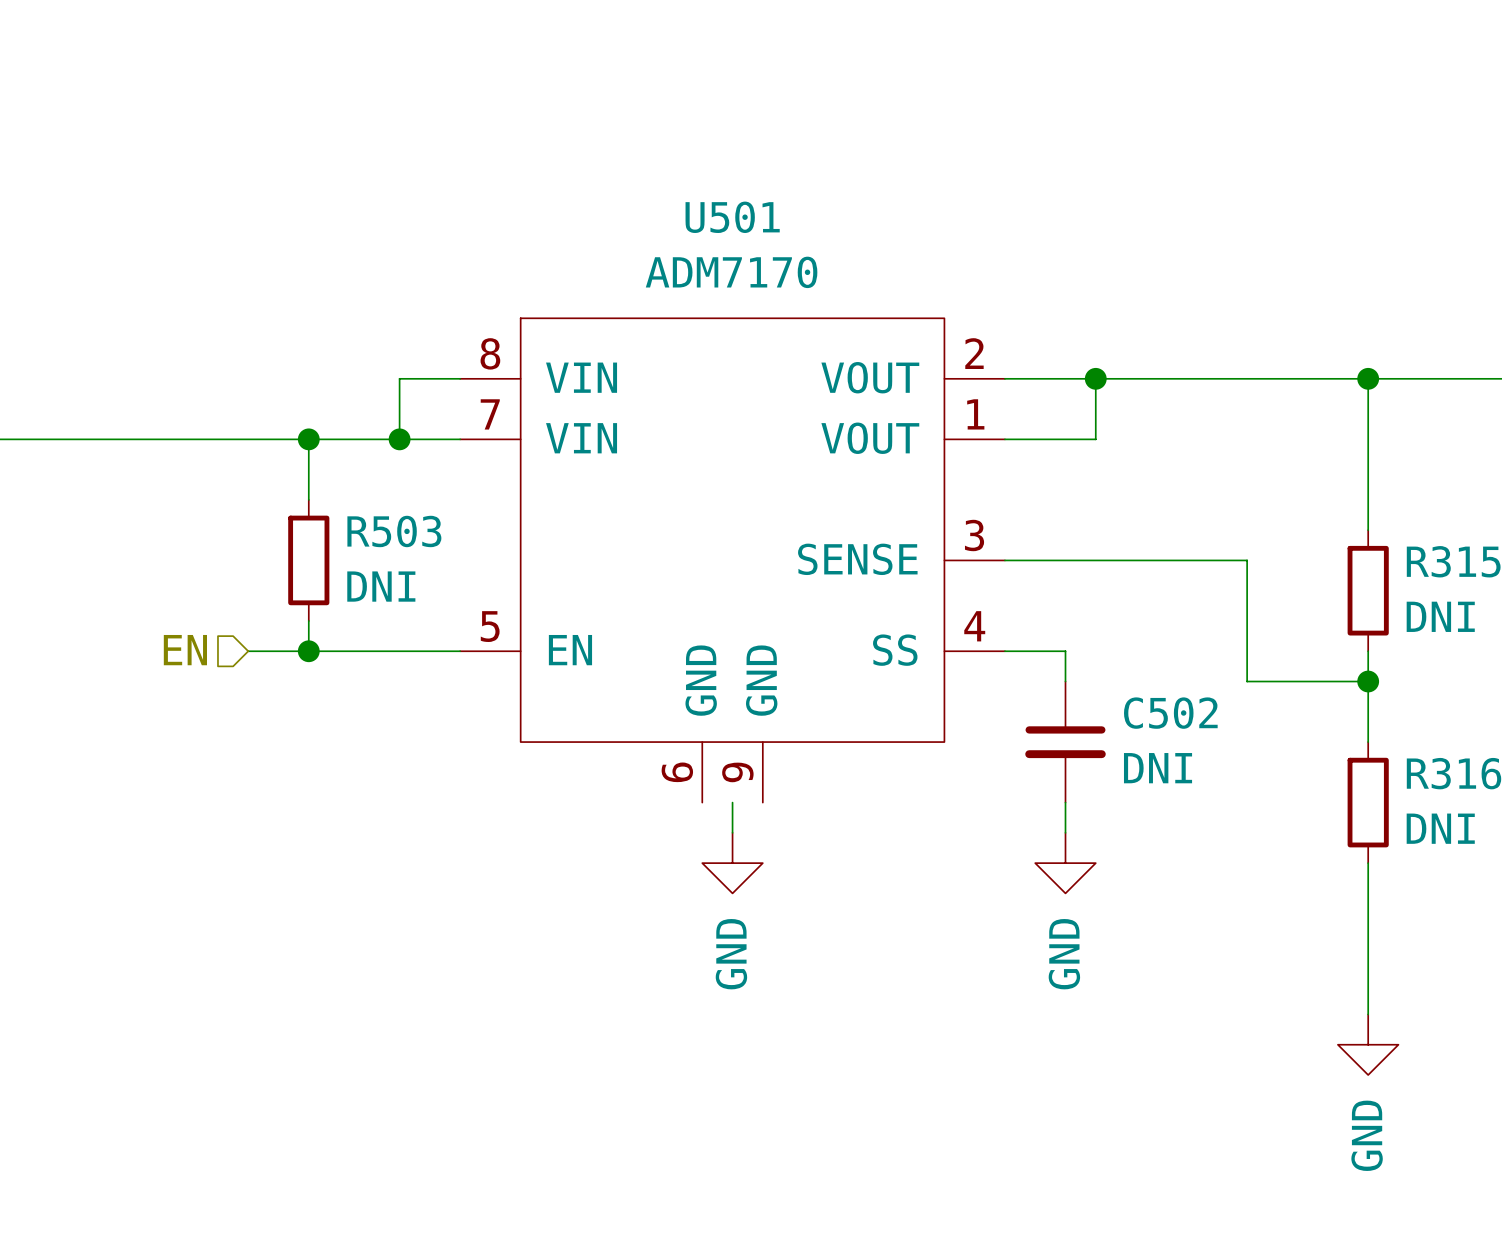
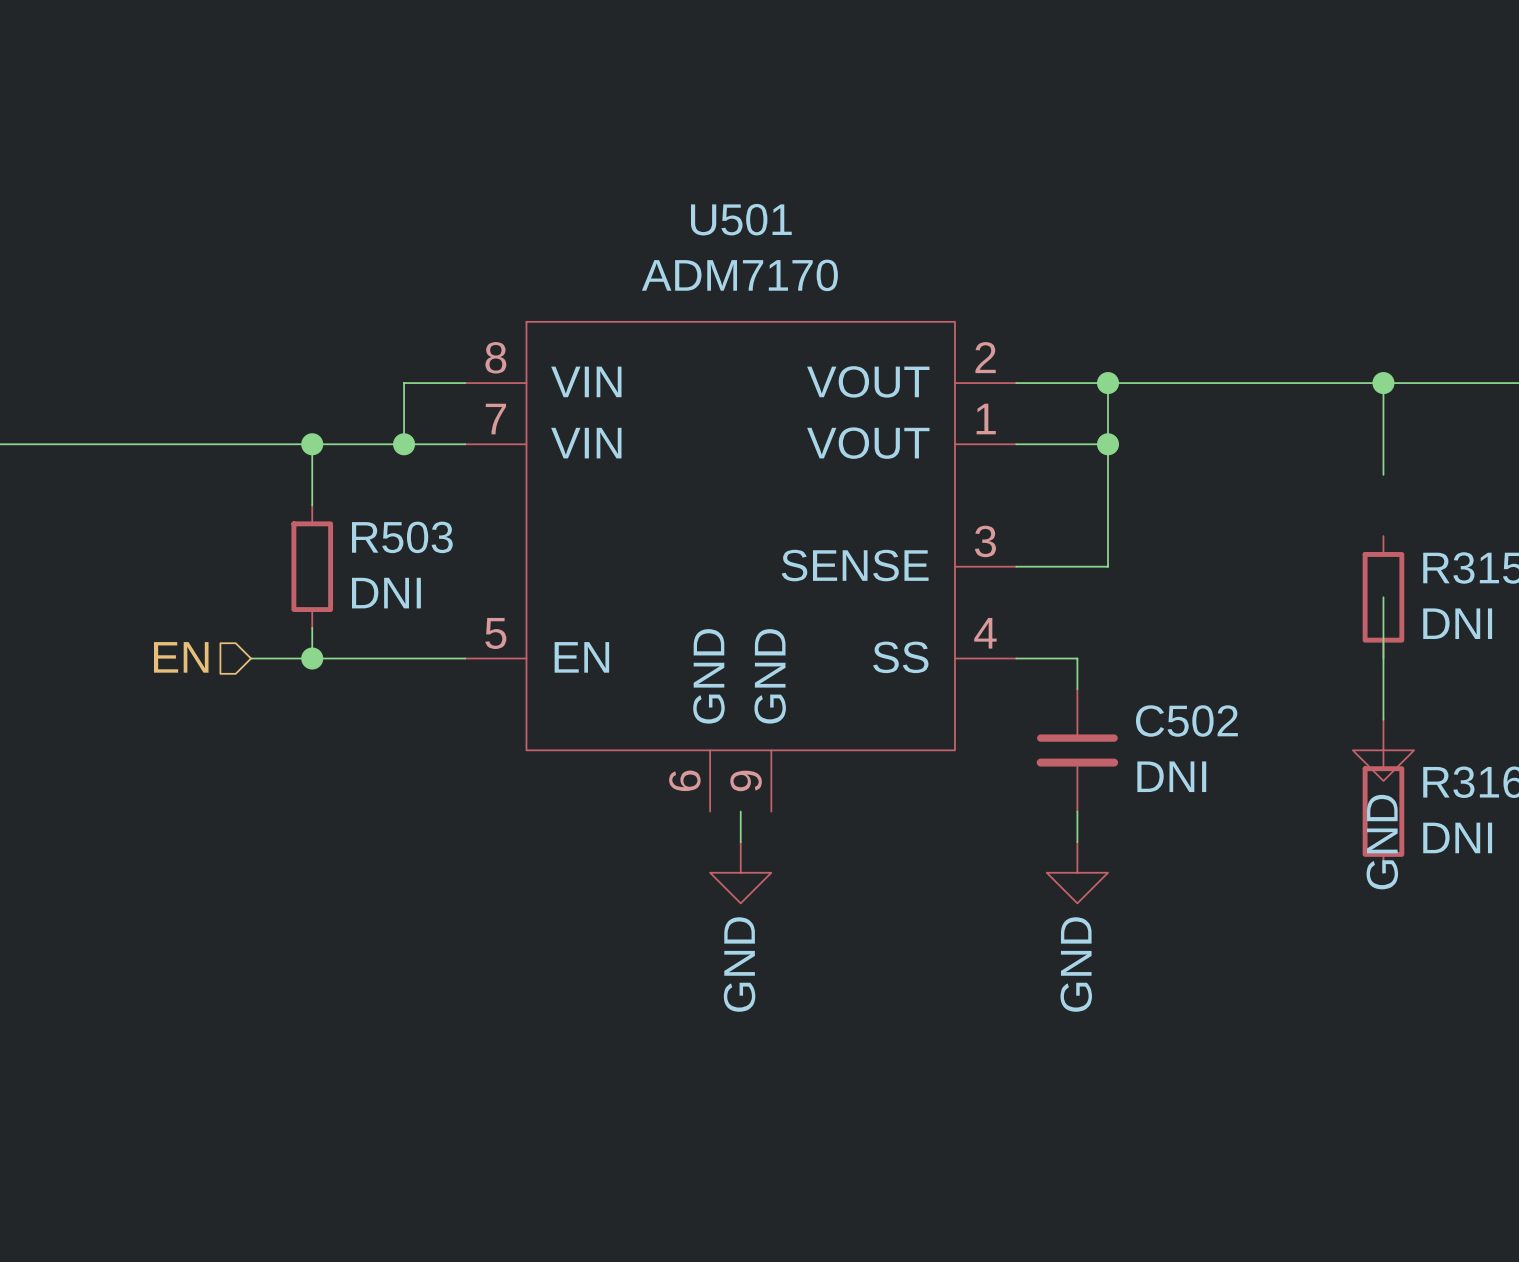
junction: none -> (1108, 444)
wire: (1368, 469) (1368, 530) -> (1383, 597) (1383, 658)
wire: (1095, 560) (1247, 560) (1247, 681) (1368, 681) -> (1108, 566) (1108, 444)
junction: (1368, 681) -> none
power symbol: none -> GND (1383, 750)
wire: (1368, 863) (1368, 1014) -> none
power symbol: GND (1368, 1044) -> none

